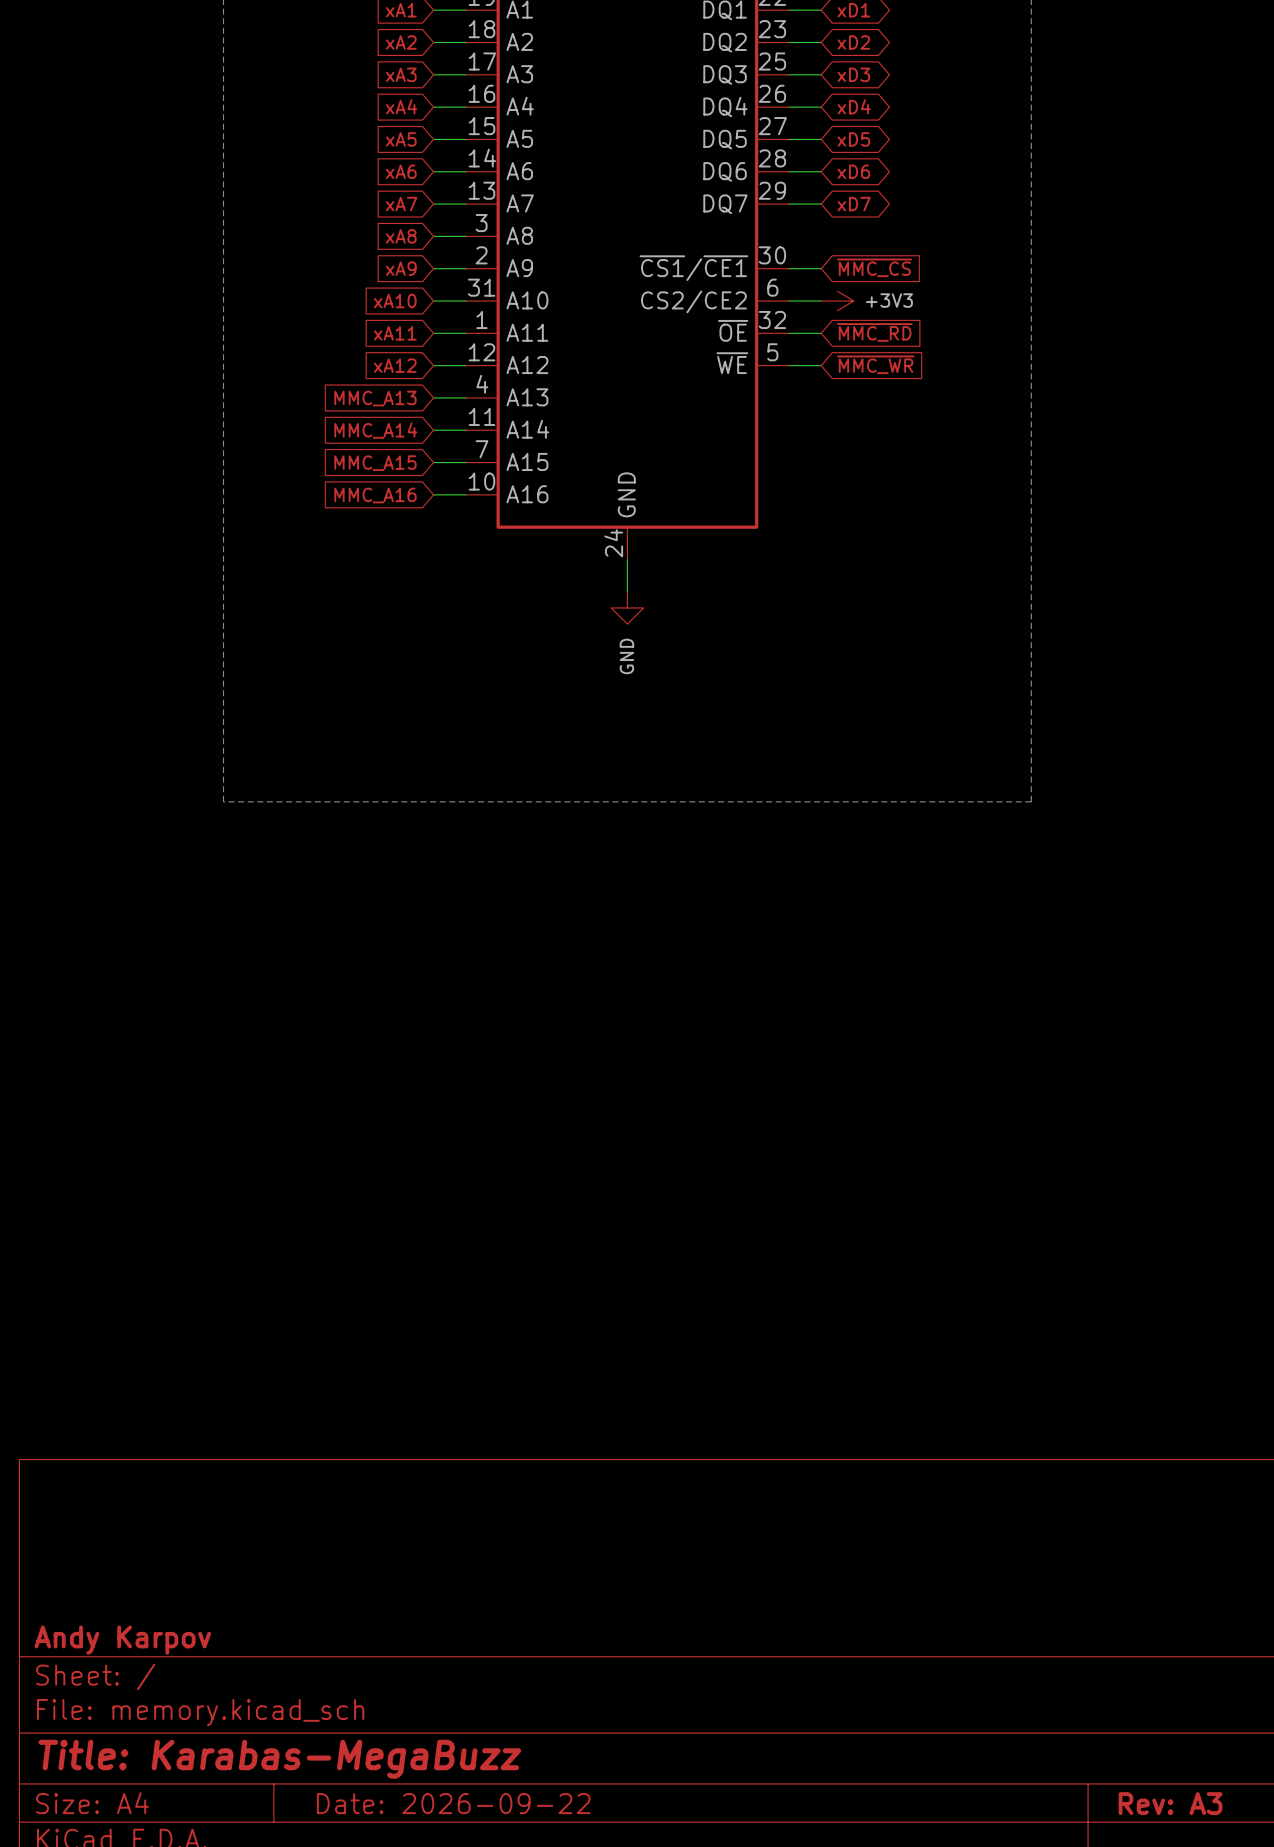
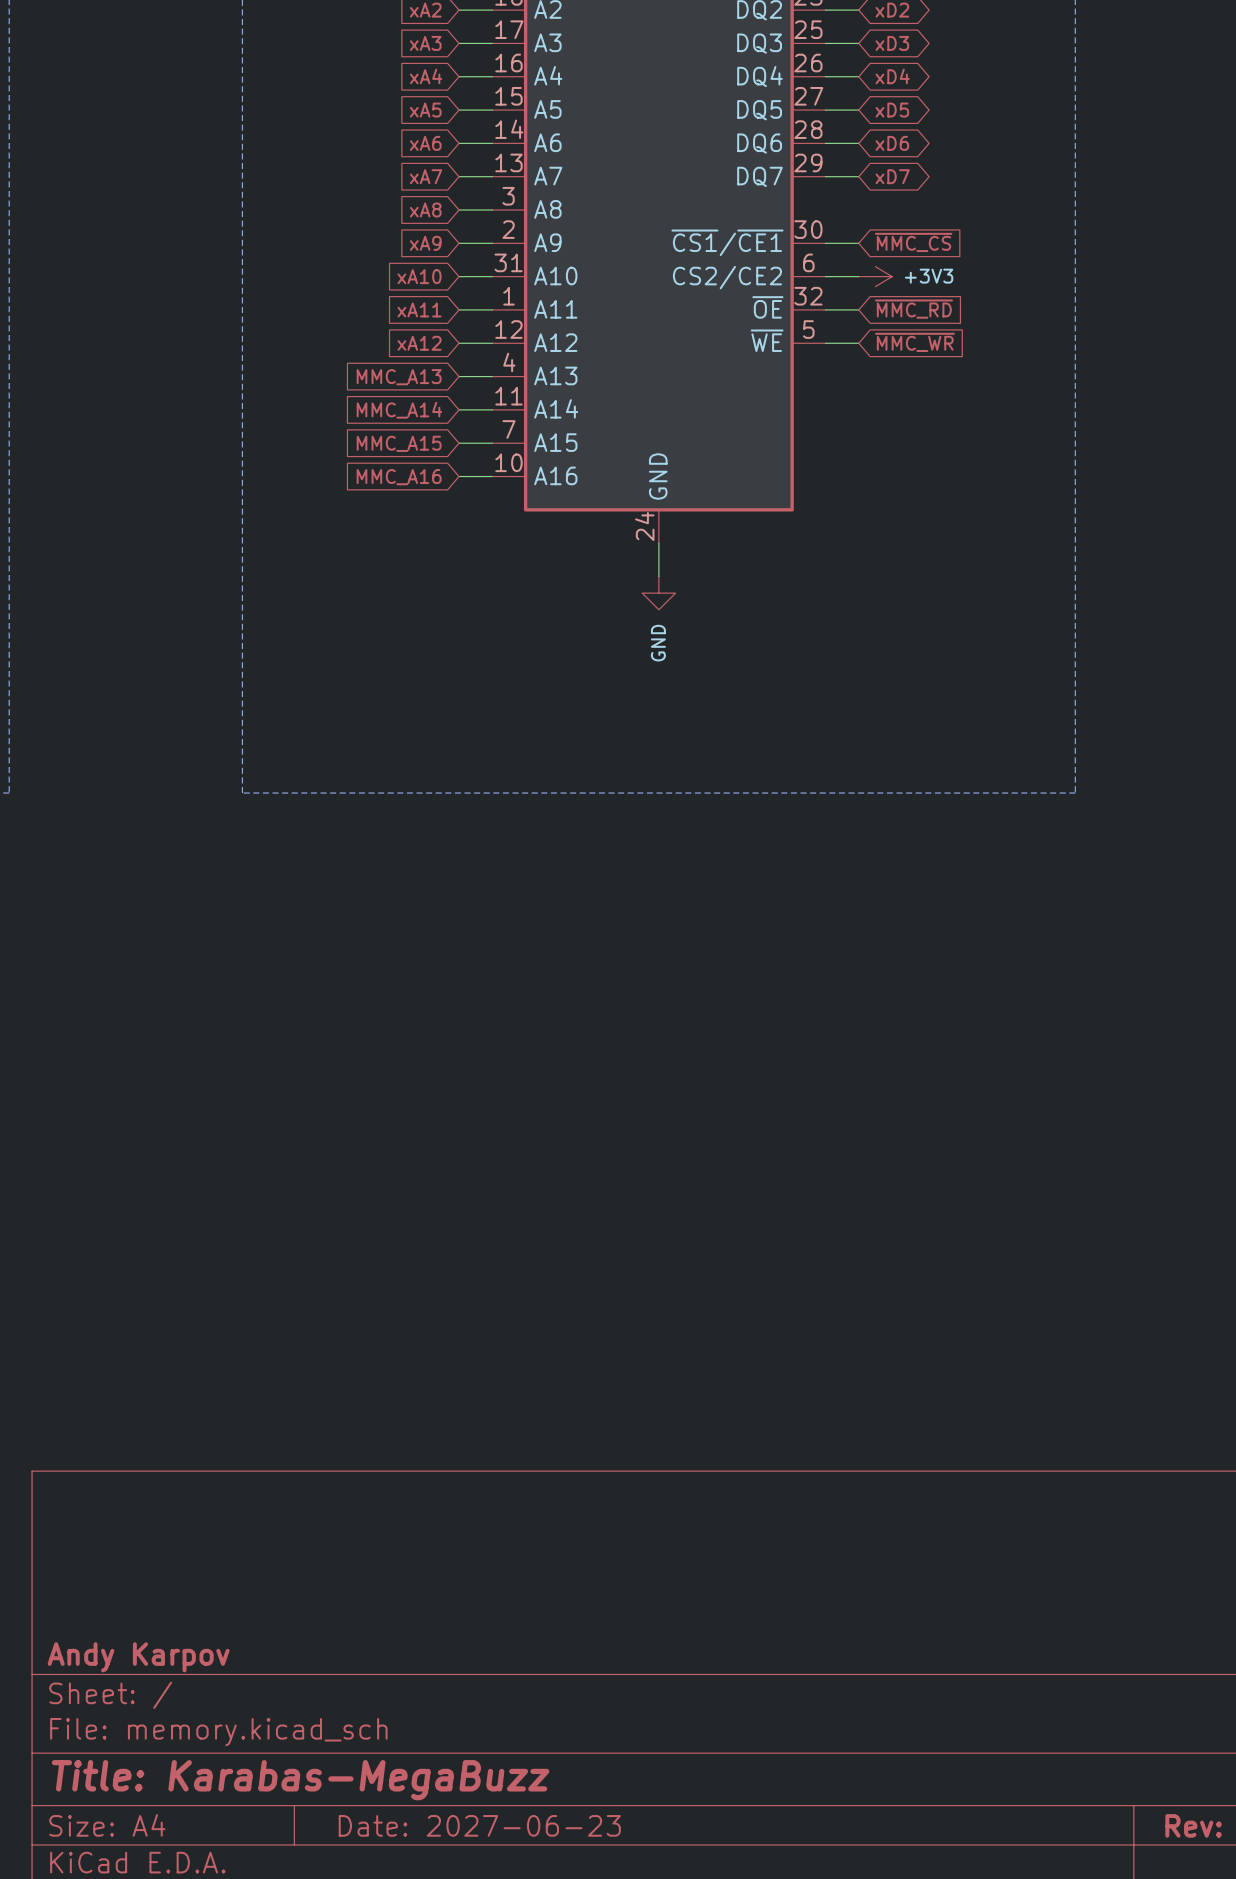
title block: Date: 2026-09-22 (453, 1803) -> Date: 2027-06-23 (479, 1825)

